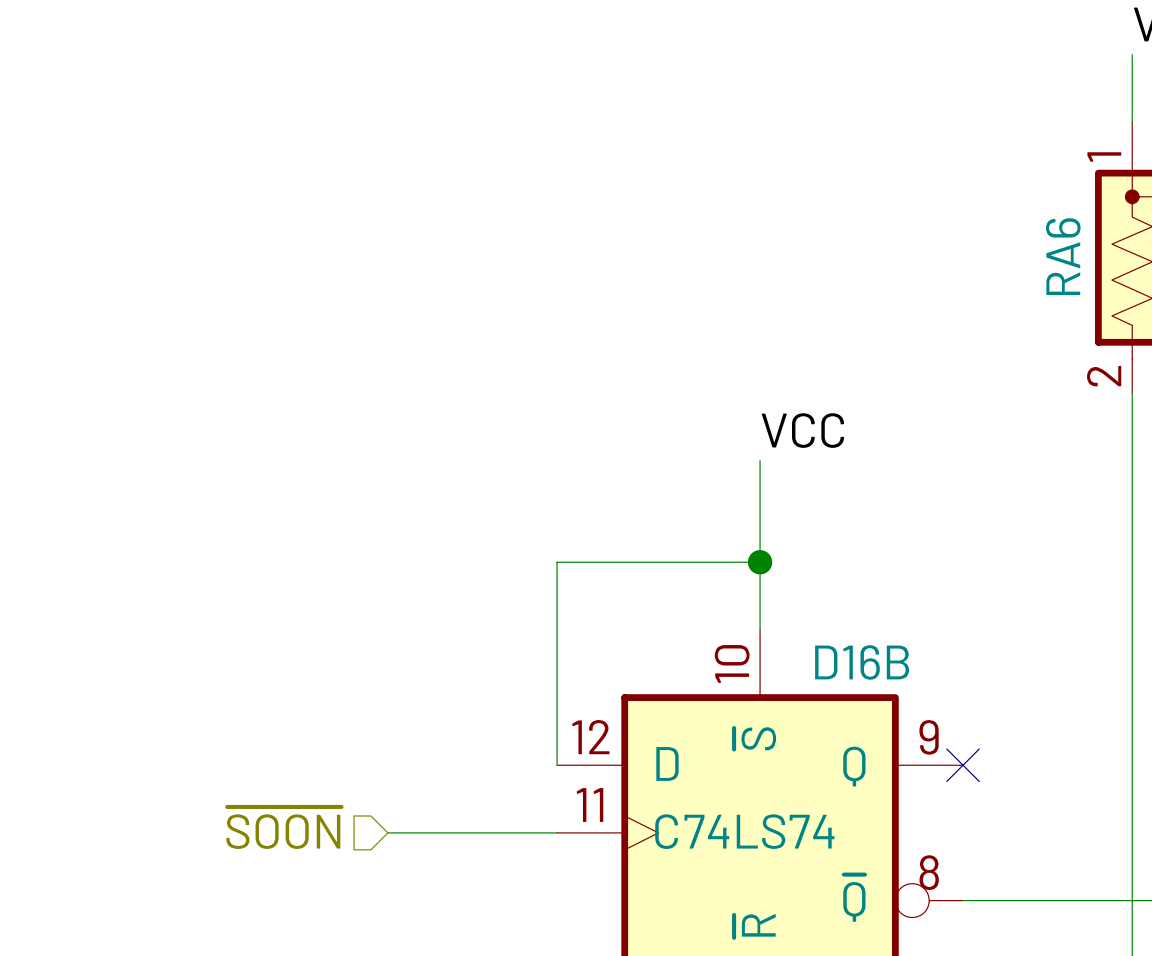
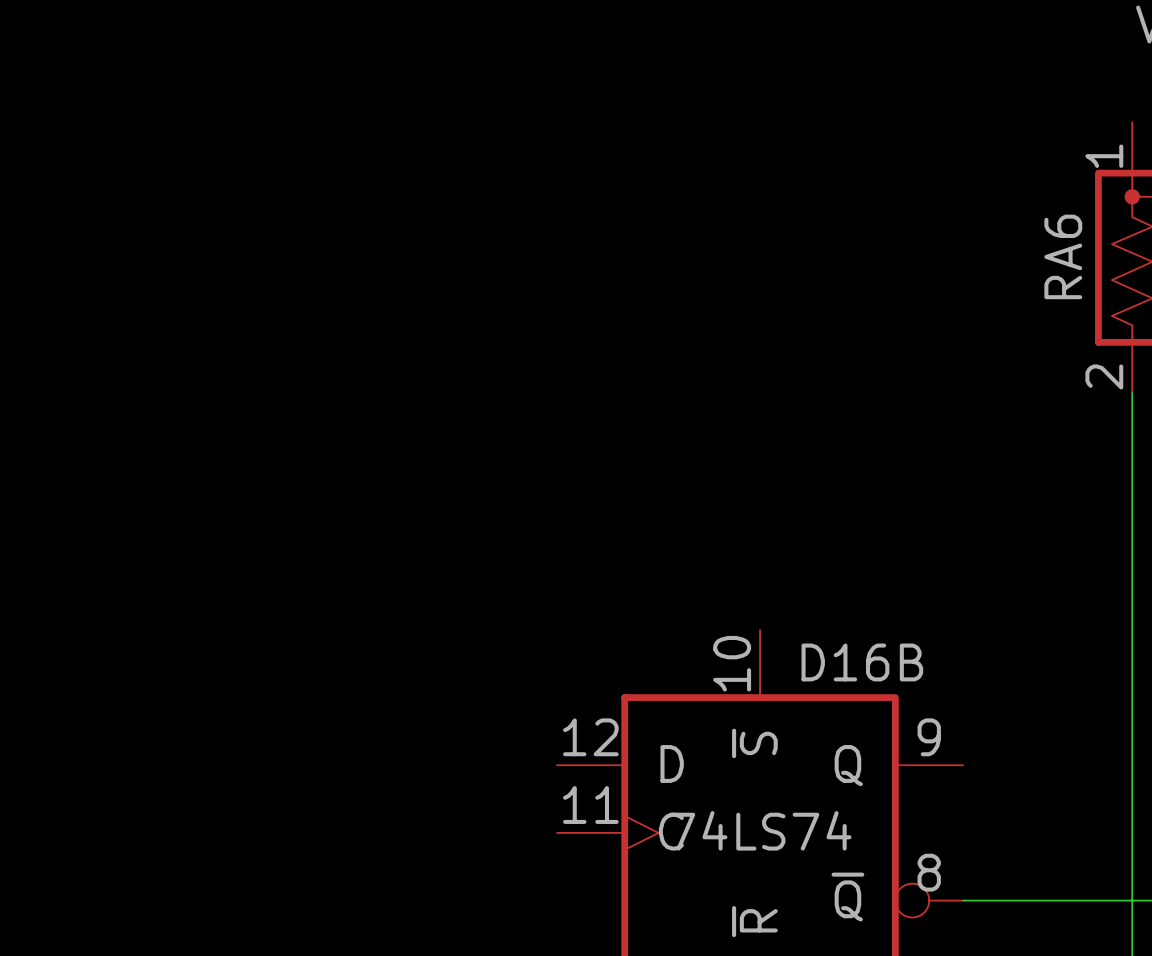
wire: (1132, 54) (1132, 122) -> none
label: VCC (802, 430) -> none
wire: (760, 460) (760, 629) -> none
wire: (760, 562) (557, 562) (557, 765) -> none
junction: (760, 562) -> none
no-connect mark: (963, 765) -> none
hierarchical label: ~{SOON} (283, 827) -> none
wire: (387, 832) (557, 832) -> none

